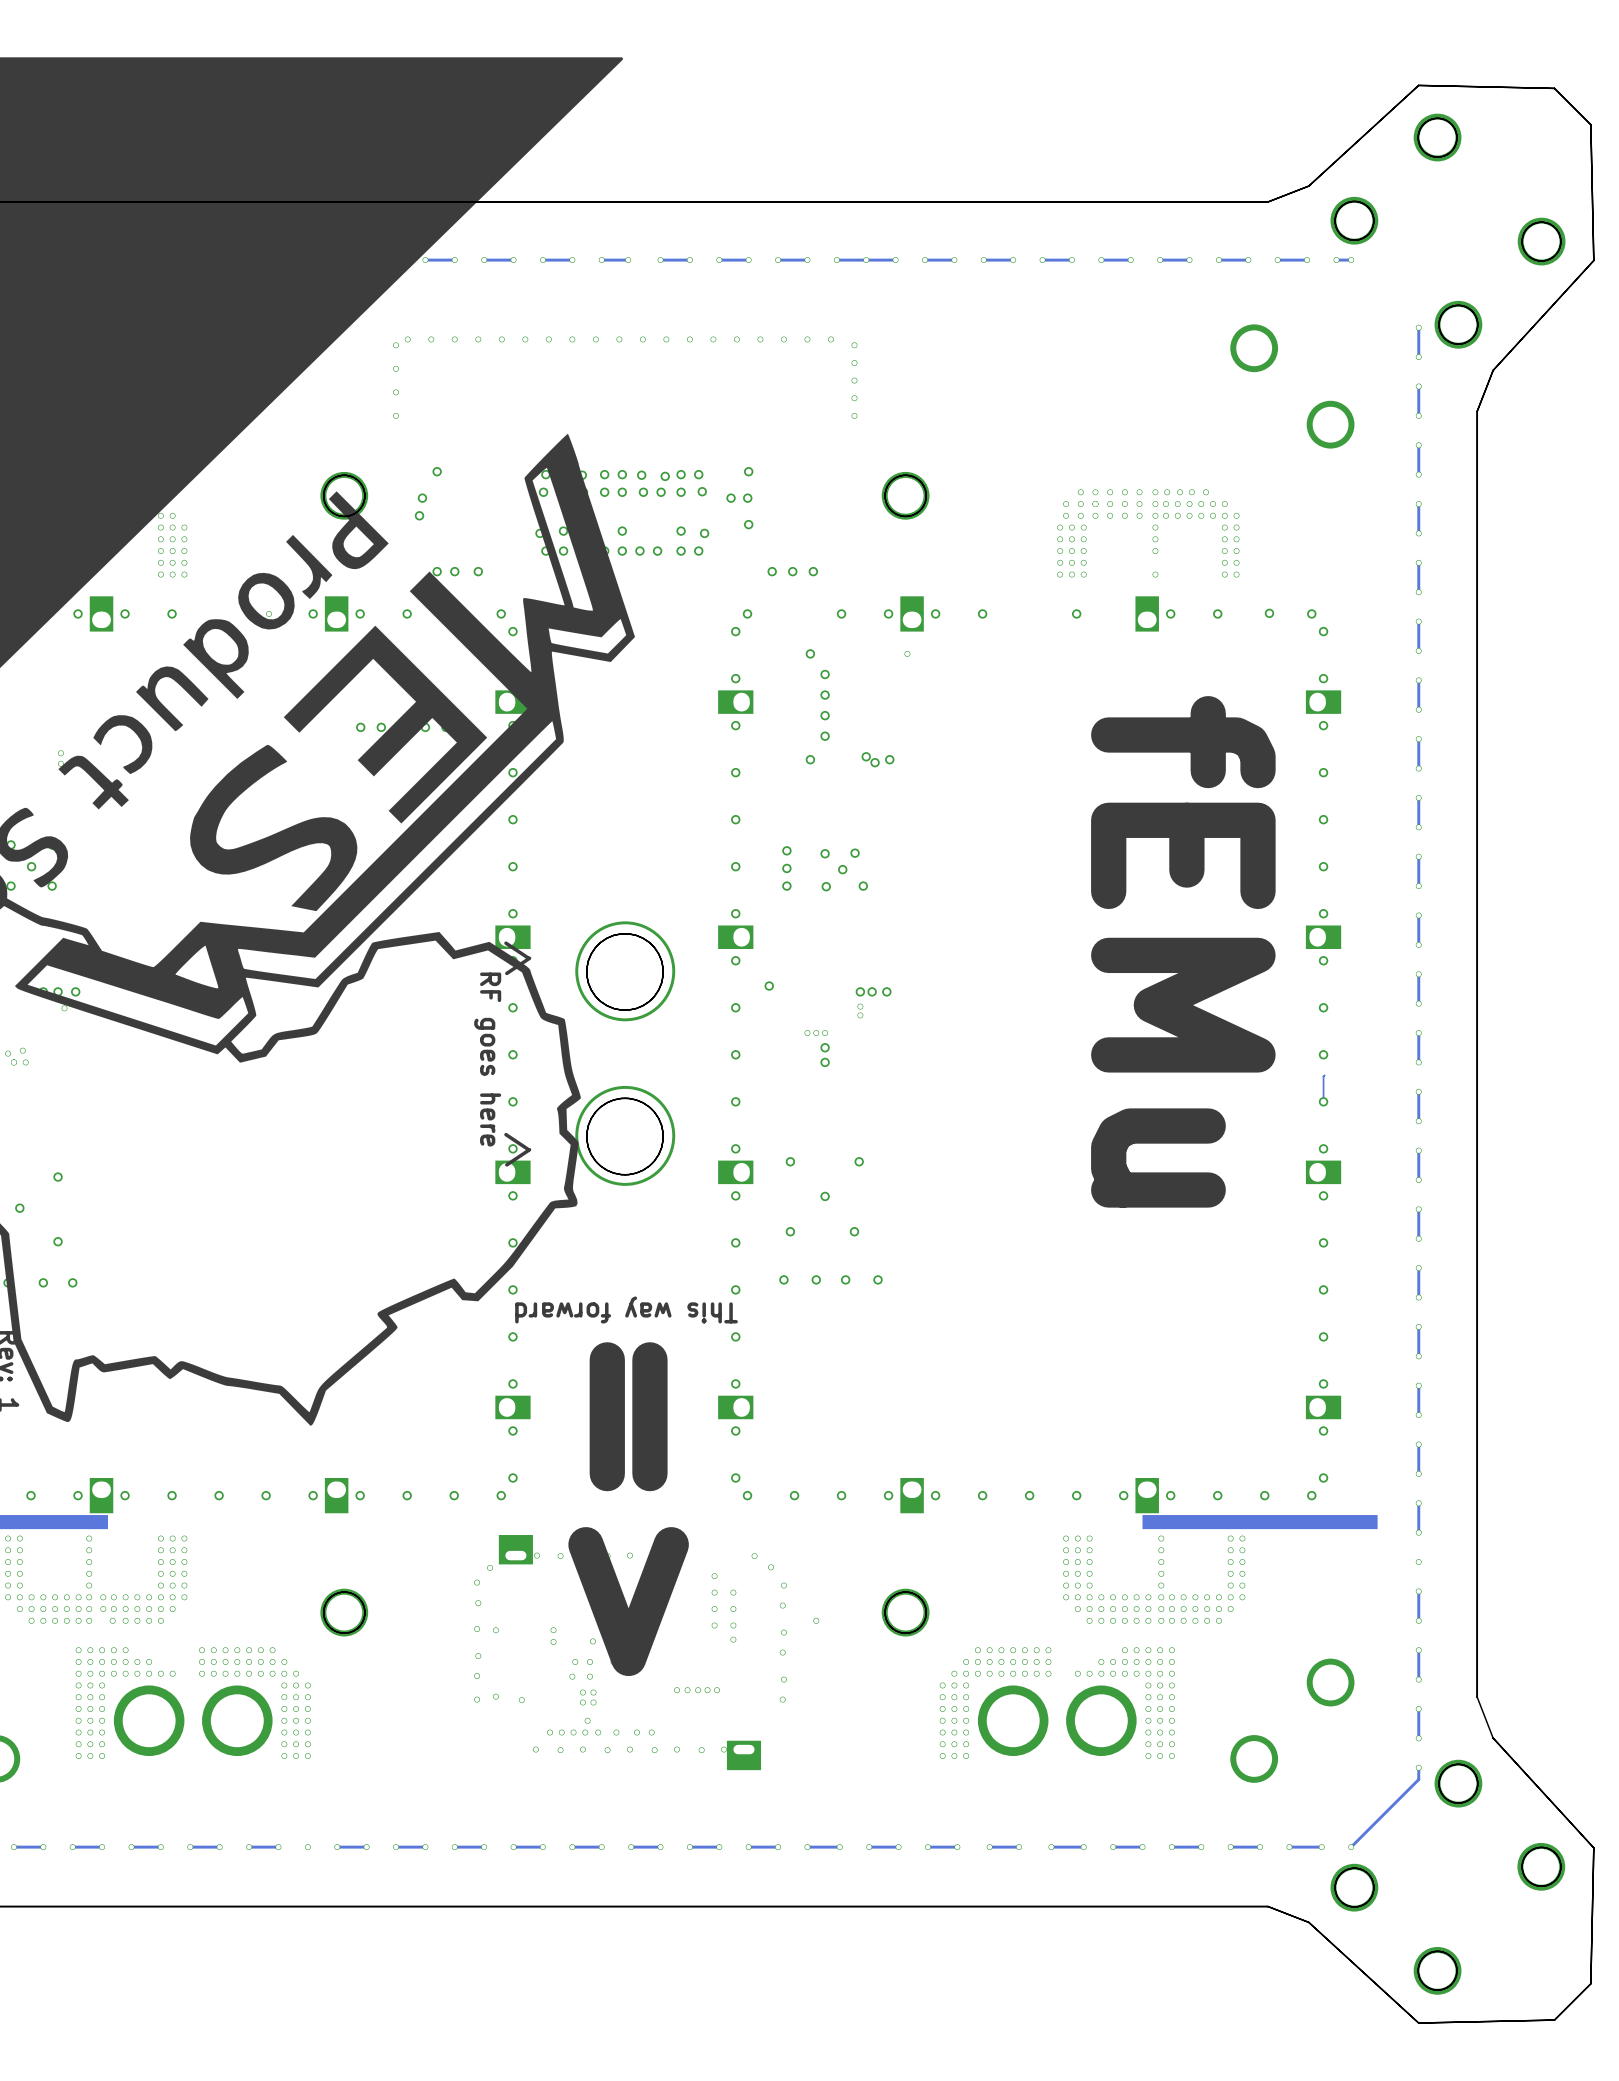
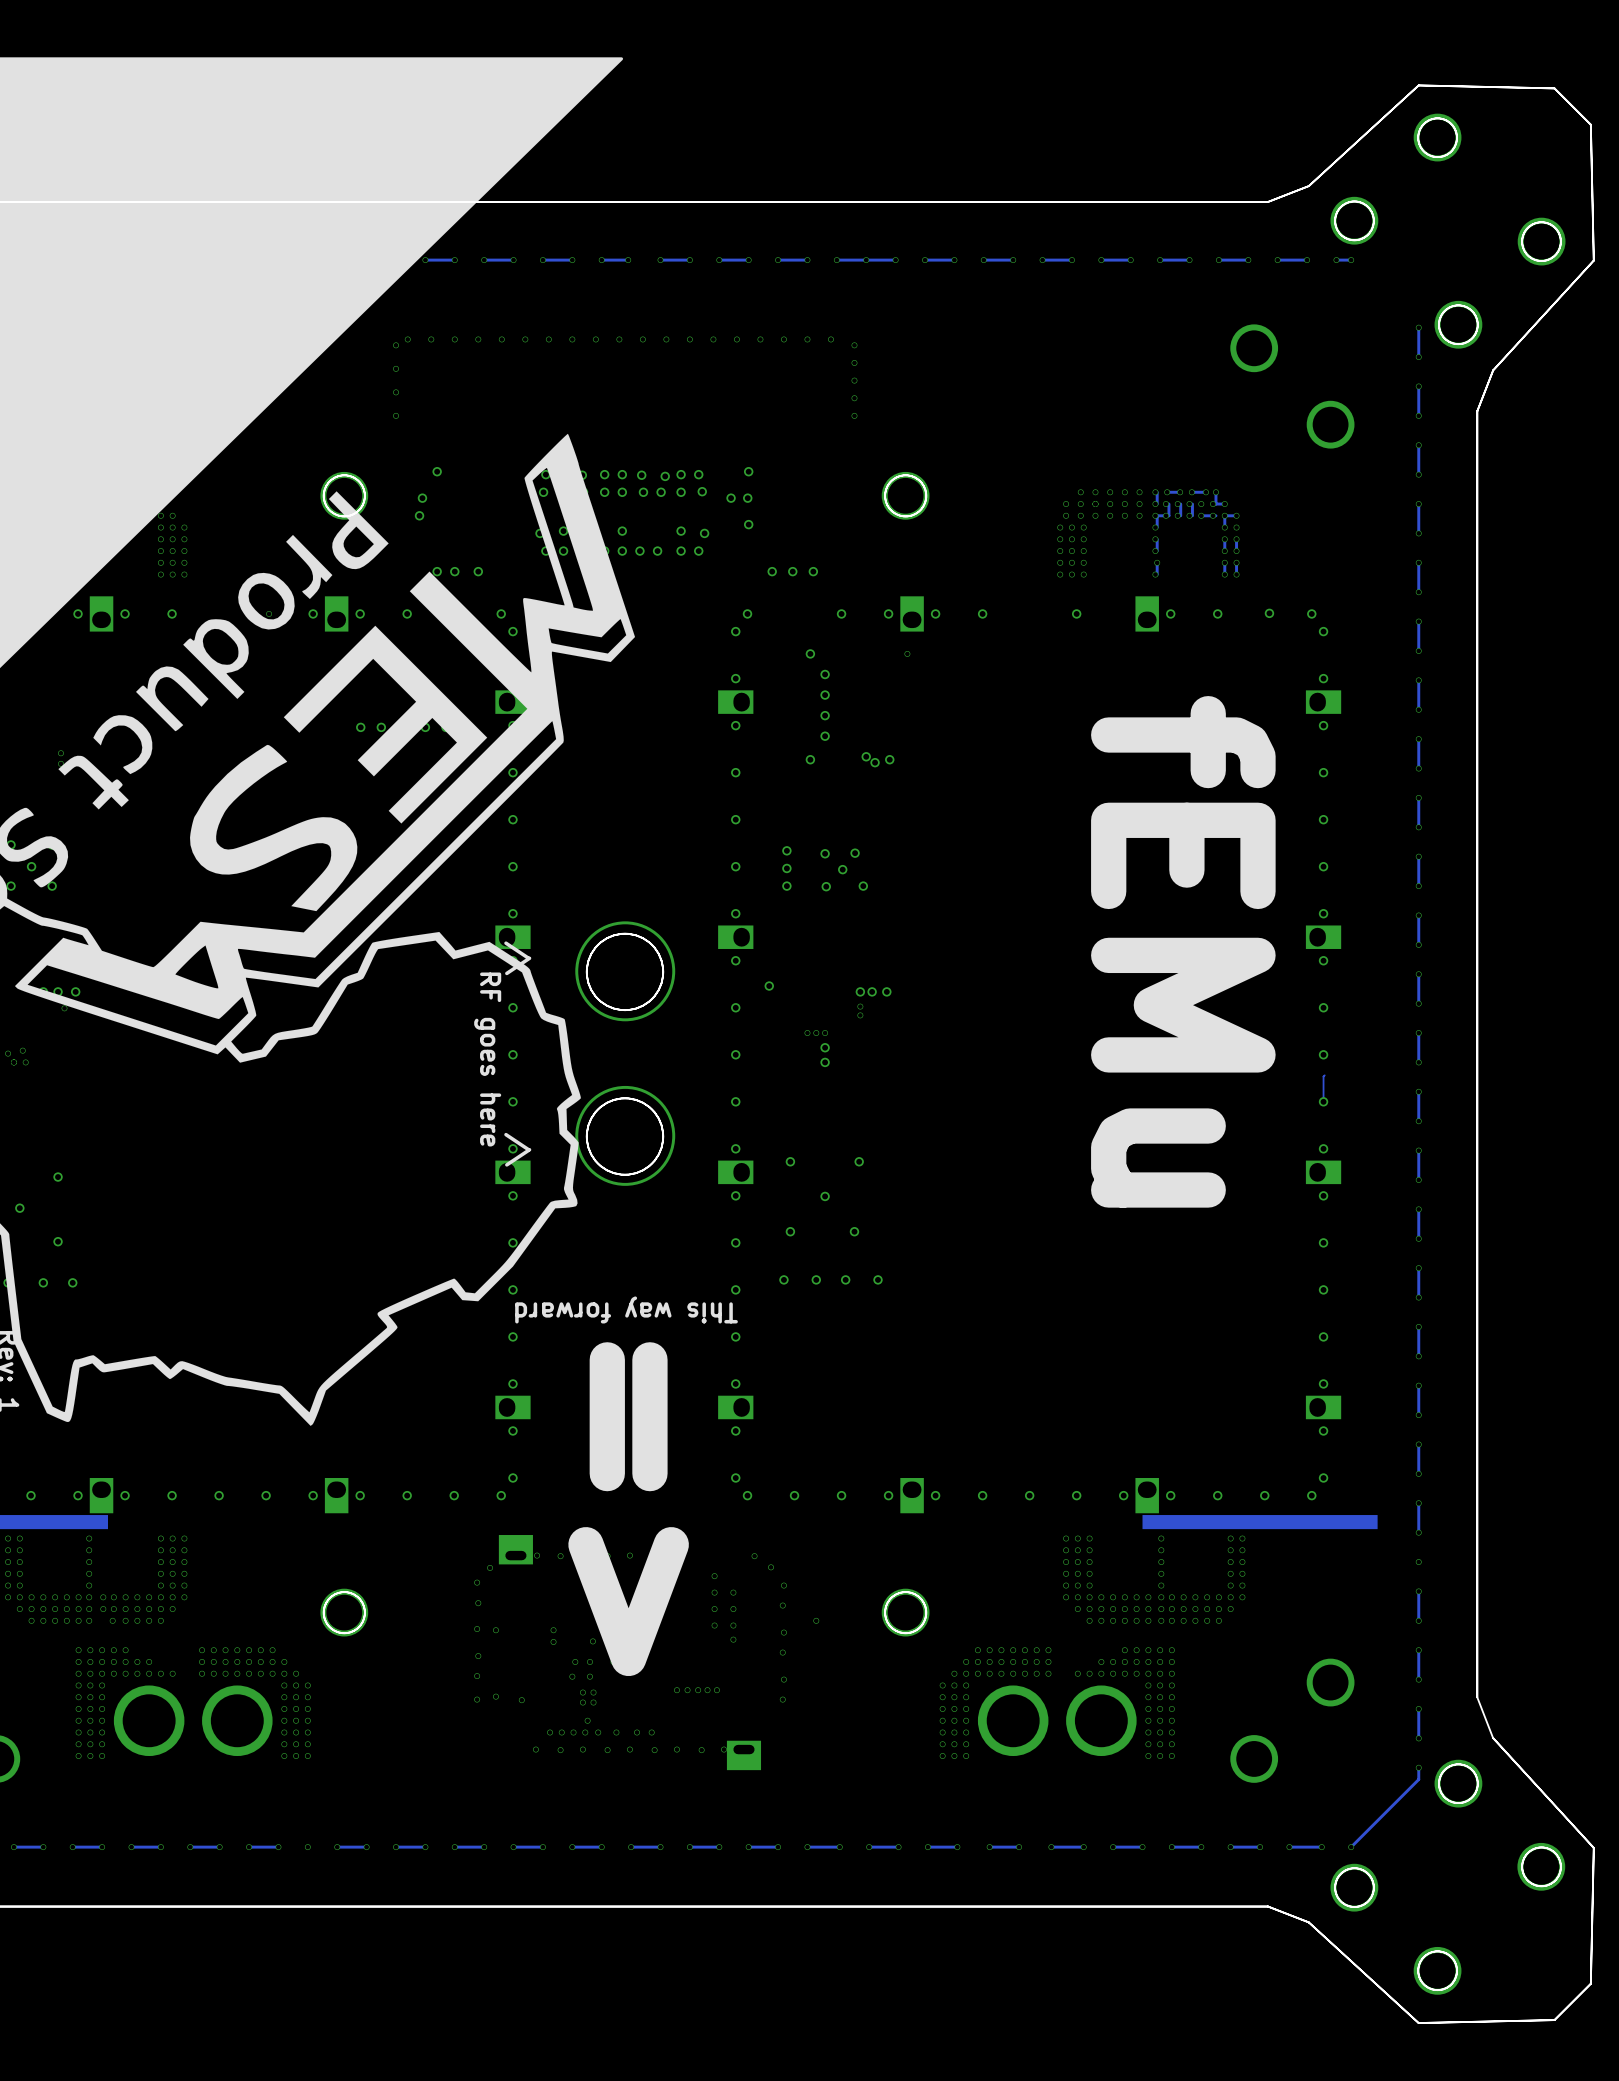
track: none -> (1157, 492) (1157, 504)
track: none -> (1180, 492) (1168, 492)
track: none -> (1204, 492) (1192, 492)
track: none -> (1215, 492) (1215, 504) (1224, 504)
via: none -> (1215, 492)
track: none -> (1168, 504) (1168, 515) (1157, 515) (1157, 527)
track: none -> (1180, 504) (1180, 515)
track: none -> (1192, 504) (1192, 515)
track: none -> (1215, 515) (1204, 515)
track: none -> (1236, 515) (1224, 515) (1224, 527)
track: none -> (1157, 539) (1157, 551)
track: none -> (1224, 539) (1224, 551)
track: none -> (1236, 539) (1236, 551)
track: none -> (1157, 562) (1157, 574)
via: none -> (1157, 562)
track: none -> (1224, 562) (1224, 574)
track: none -> (1236, 562) (1236, 574)

